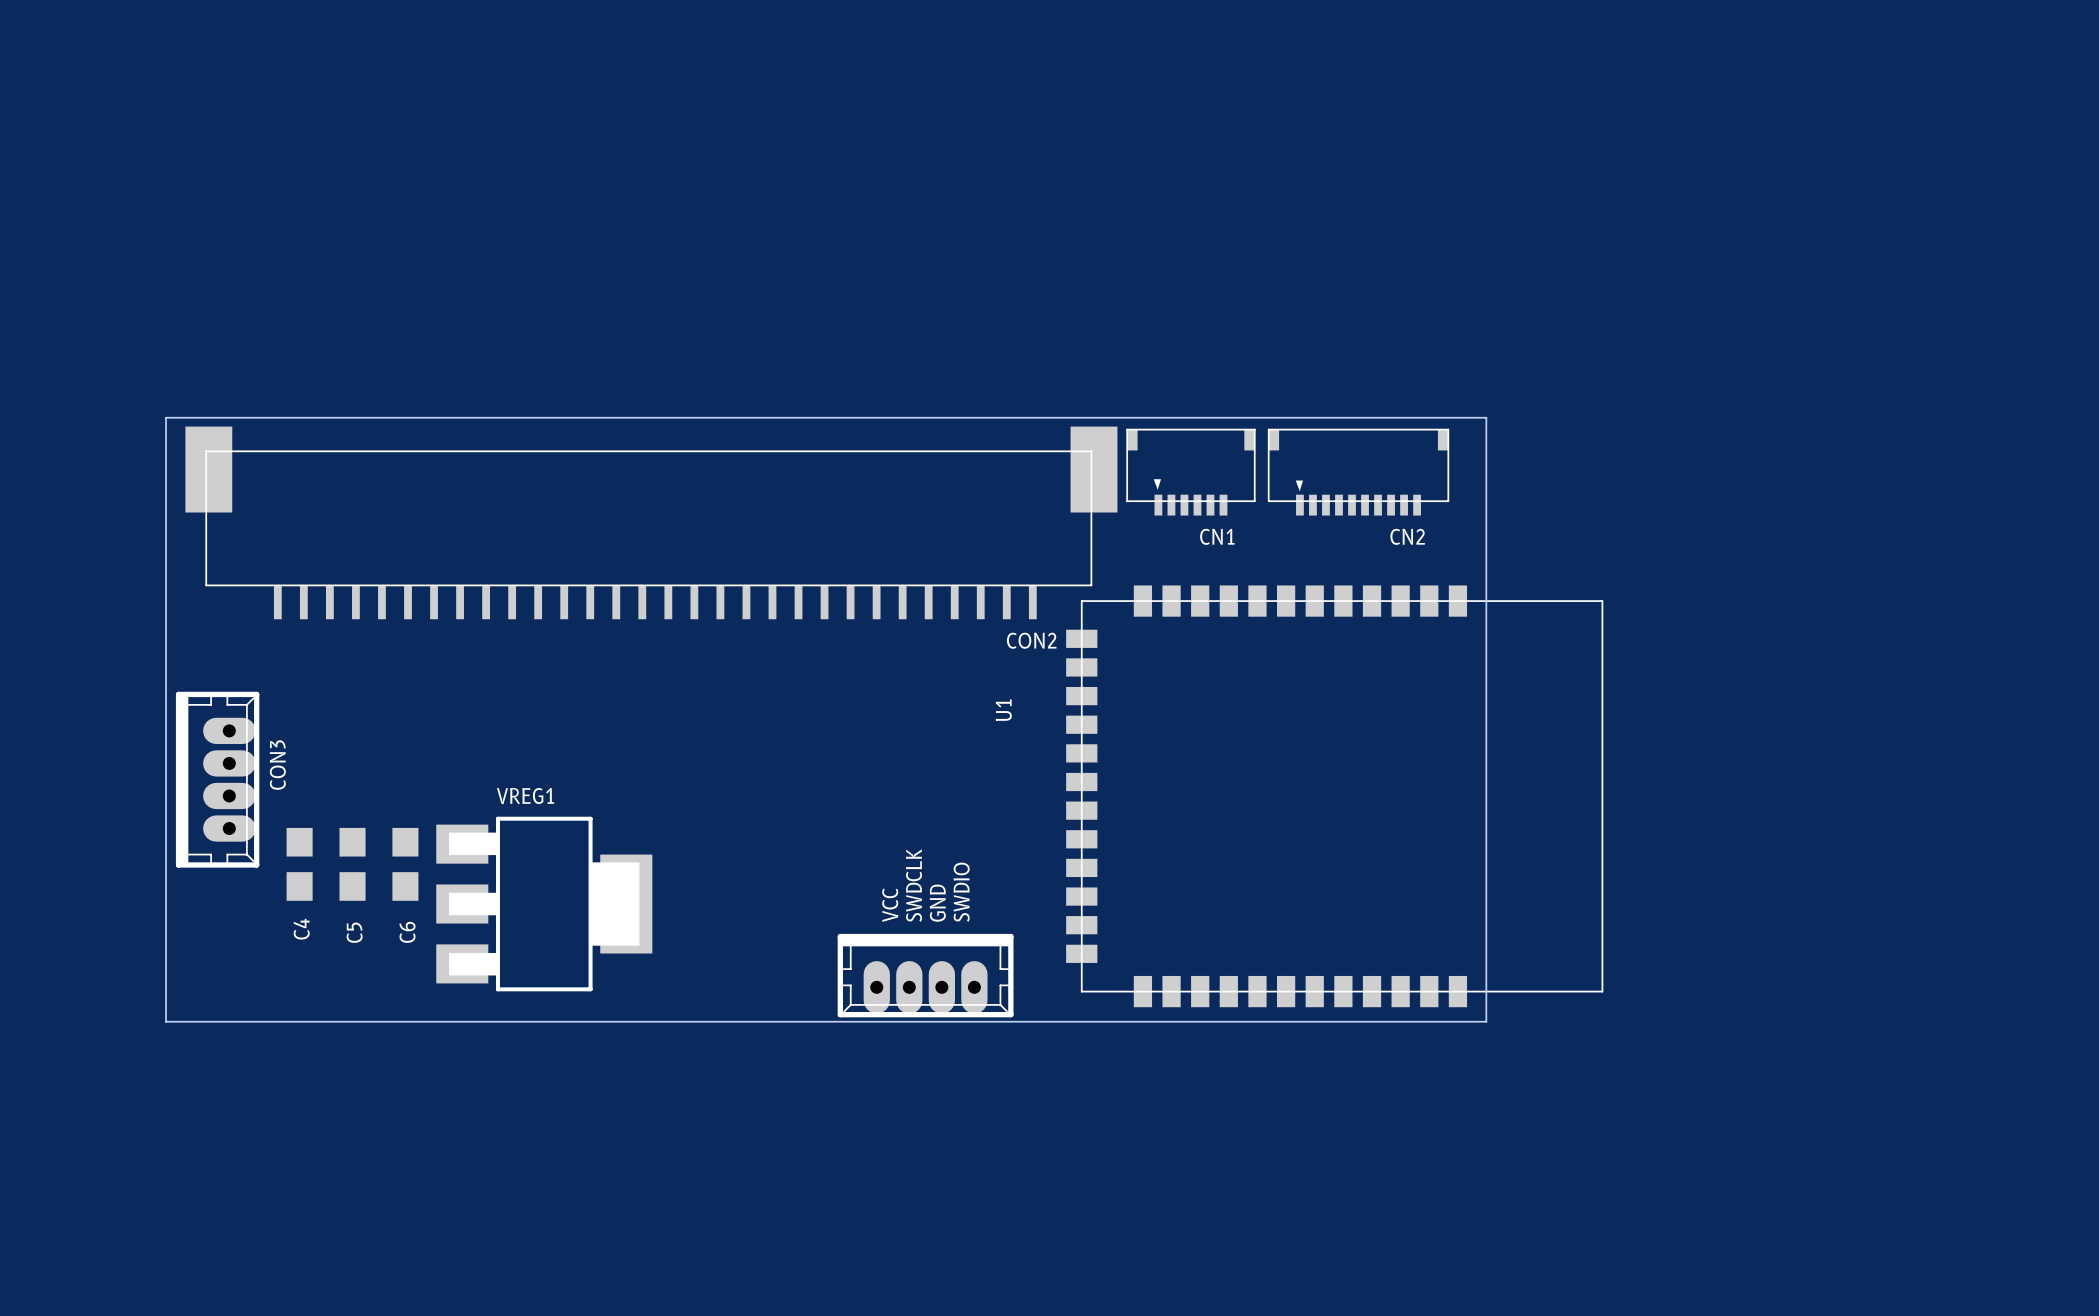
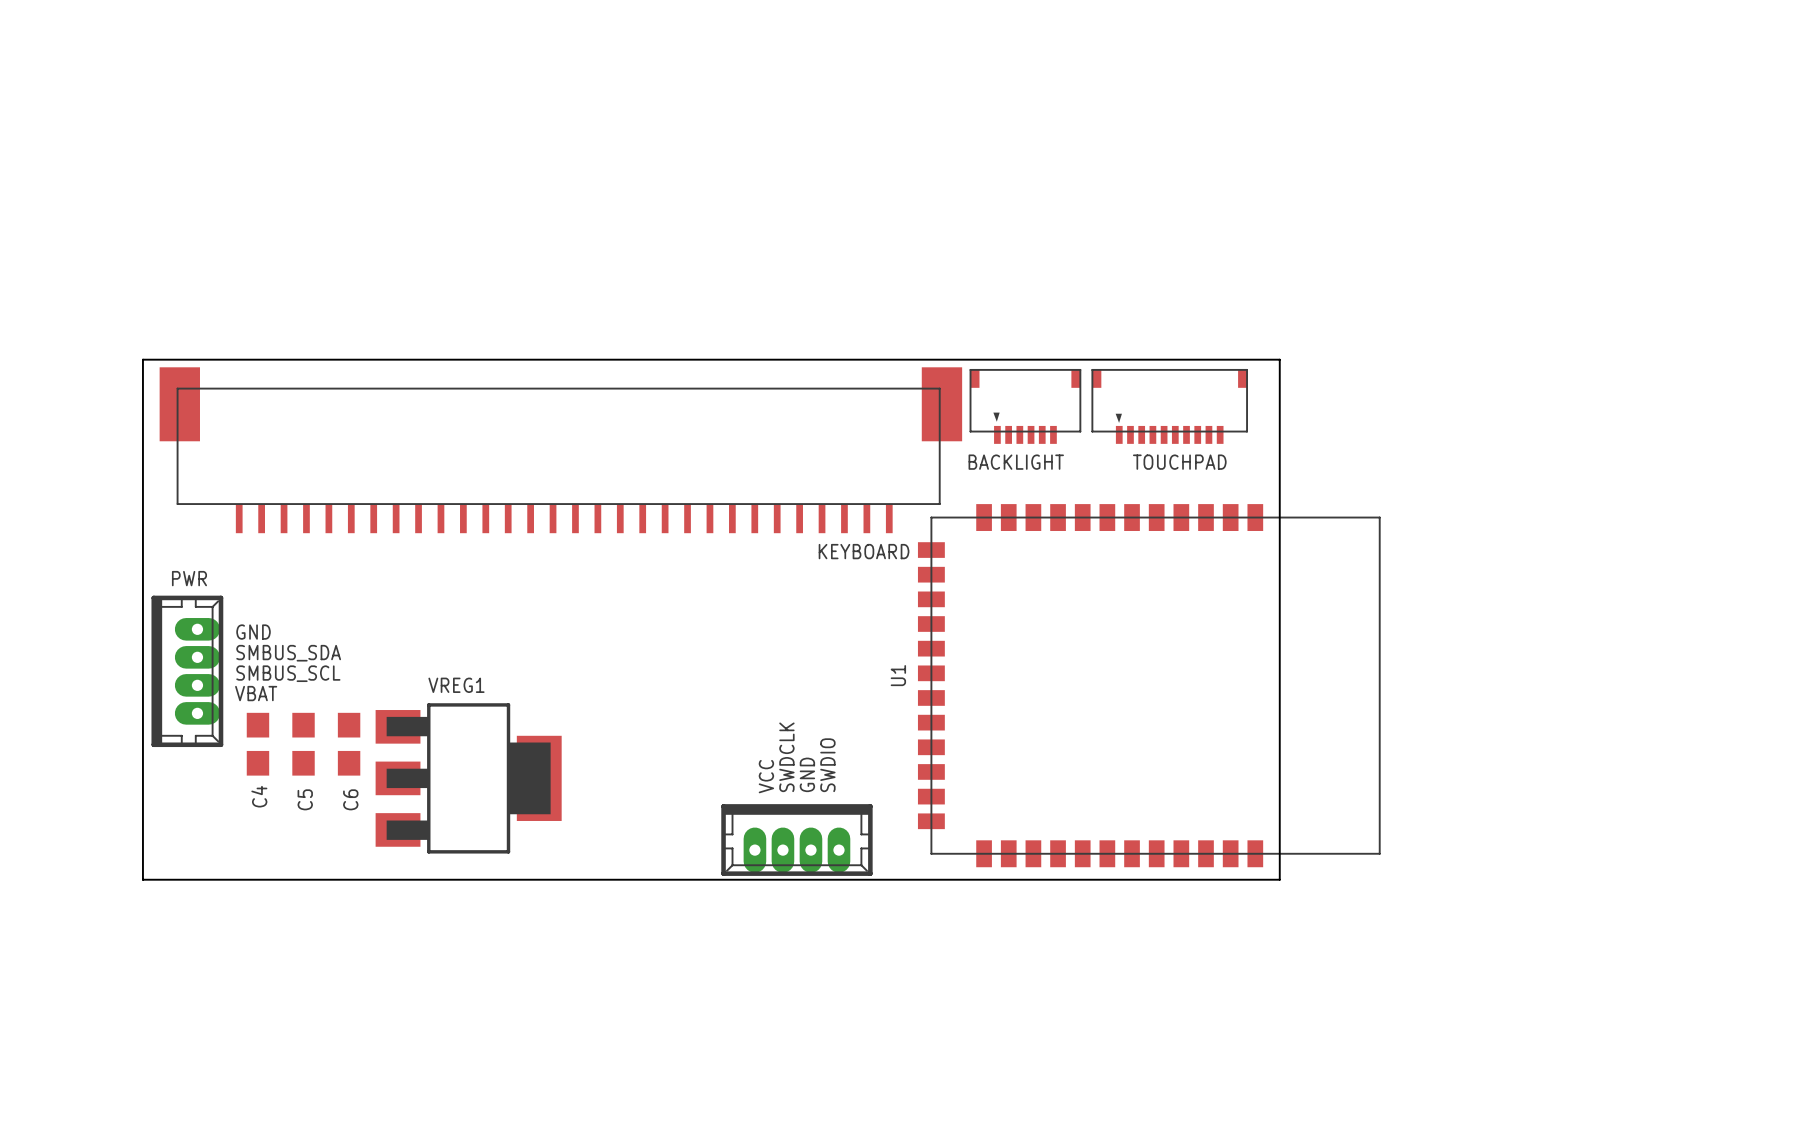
CN1 name: CN1 (1217, 536) -> BACKLIGHT (1016, 462)
CN2 name: CN2 (1407, 536) -> TOUCHPAD (1179, 462)
CON2 name: CON2 (1031, 640) -> KEYBOARD (864, 551)
U1 name position: U1 (1003, 710) -> U1 (898, 675)
text: none -> GND (253, 632)
text: none -> SMBUS_SDA (288, 653)
CON3 name: CON3 (277, 765) -> PWR (189, 578)
text: none -> SMBUS_SCL (288, 673)
text: none -> VBAT (256, 693)

